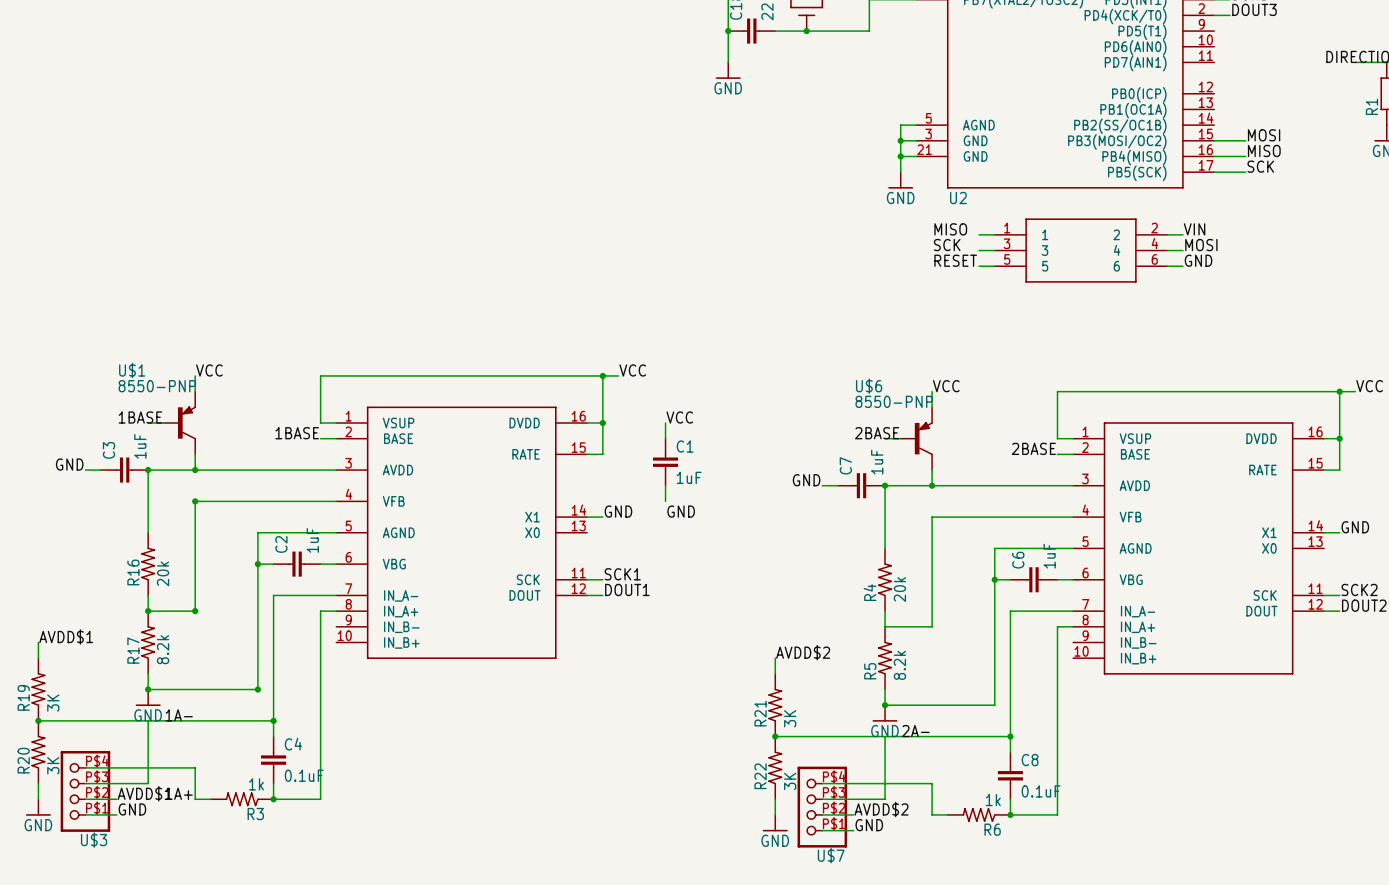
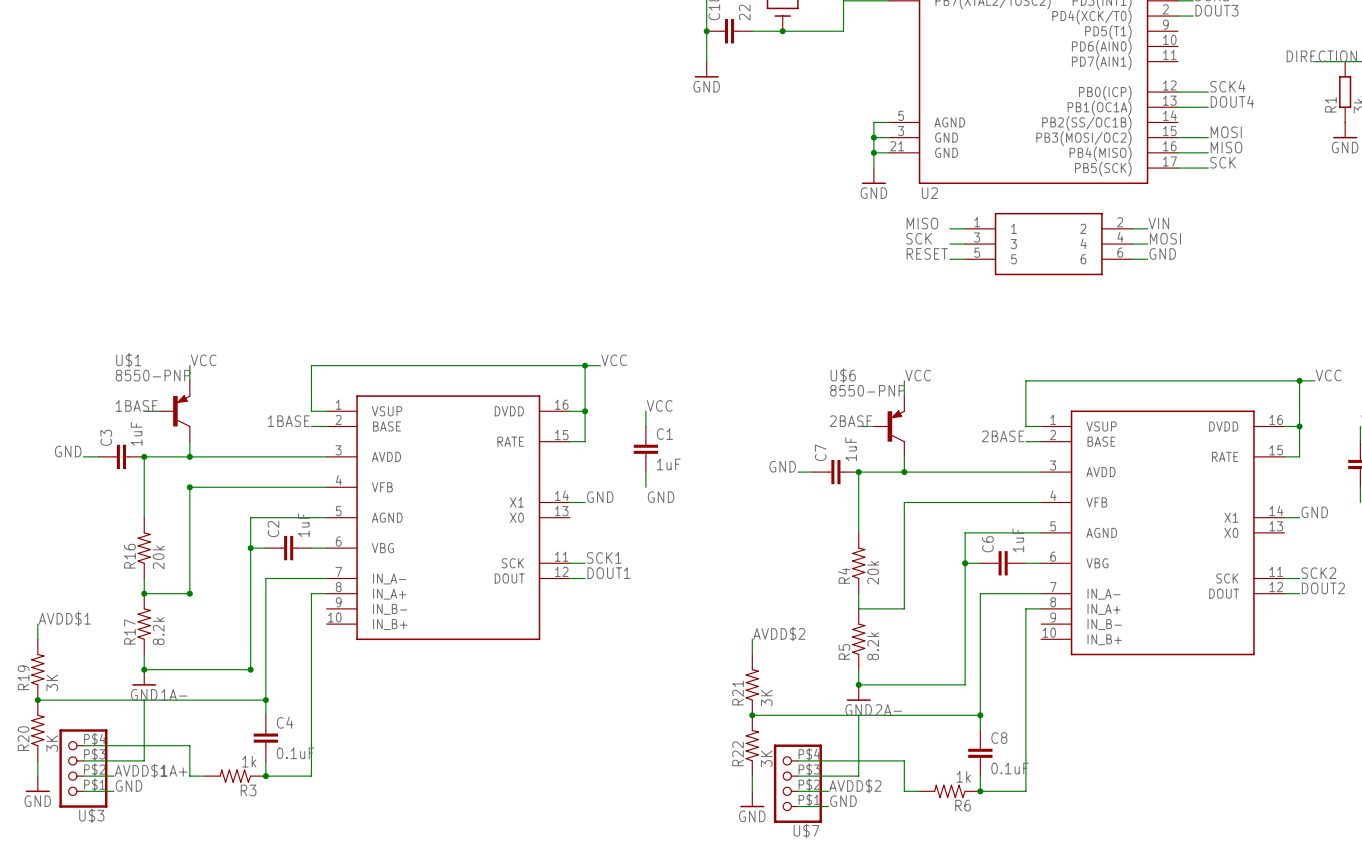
label: none -> SCK4 (1227, 86)
wire: none -> (1177, 92) (1208, 92)
label: none -> DOUT4 (1232, 101)
wire: none -> (1177, 107) (1208, 107)

